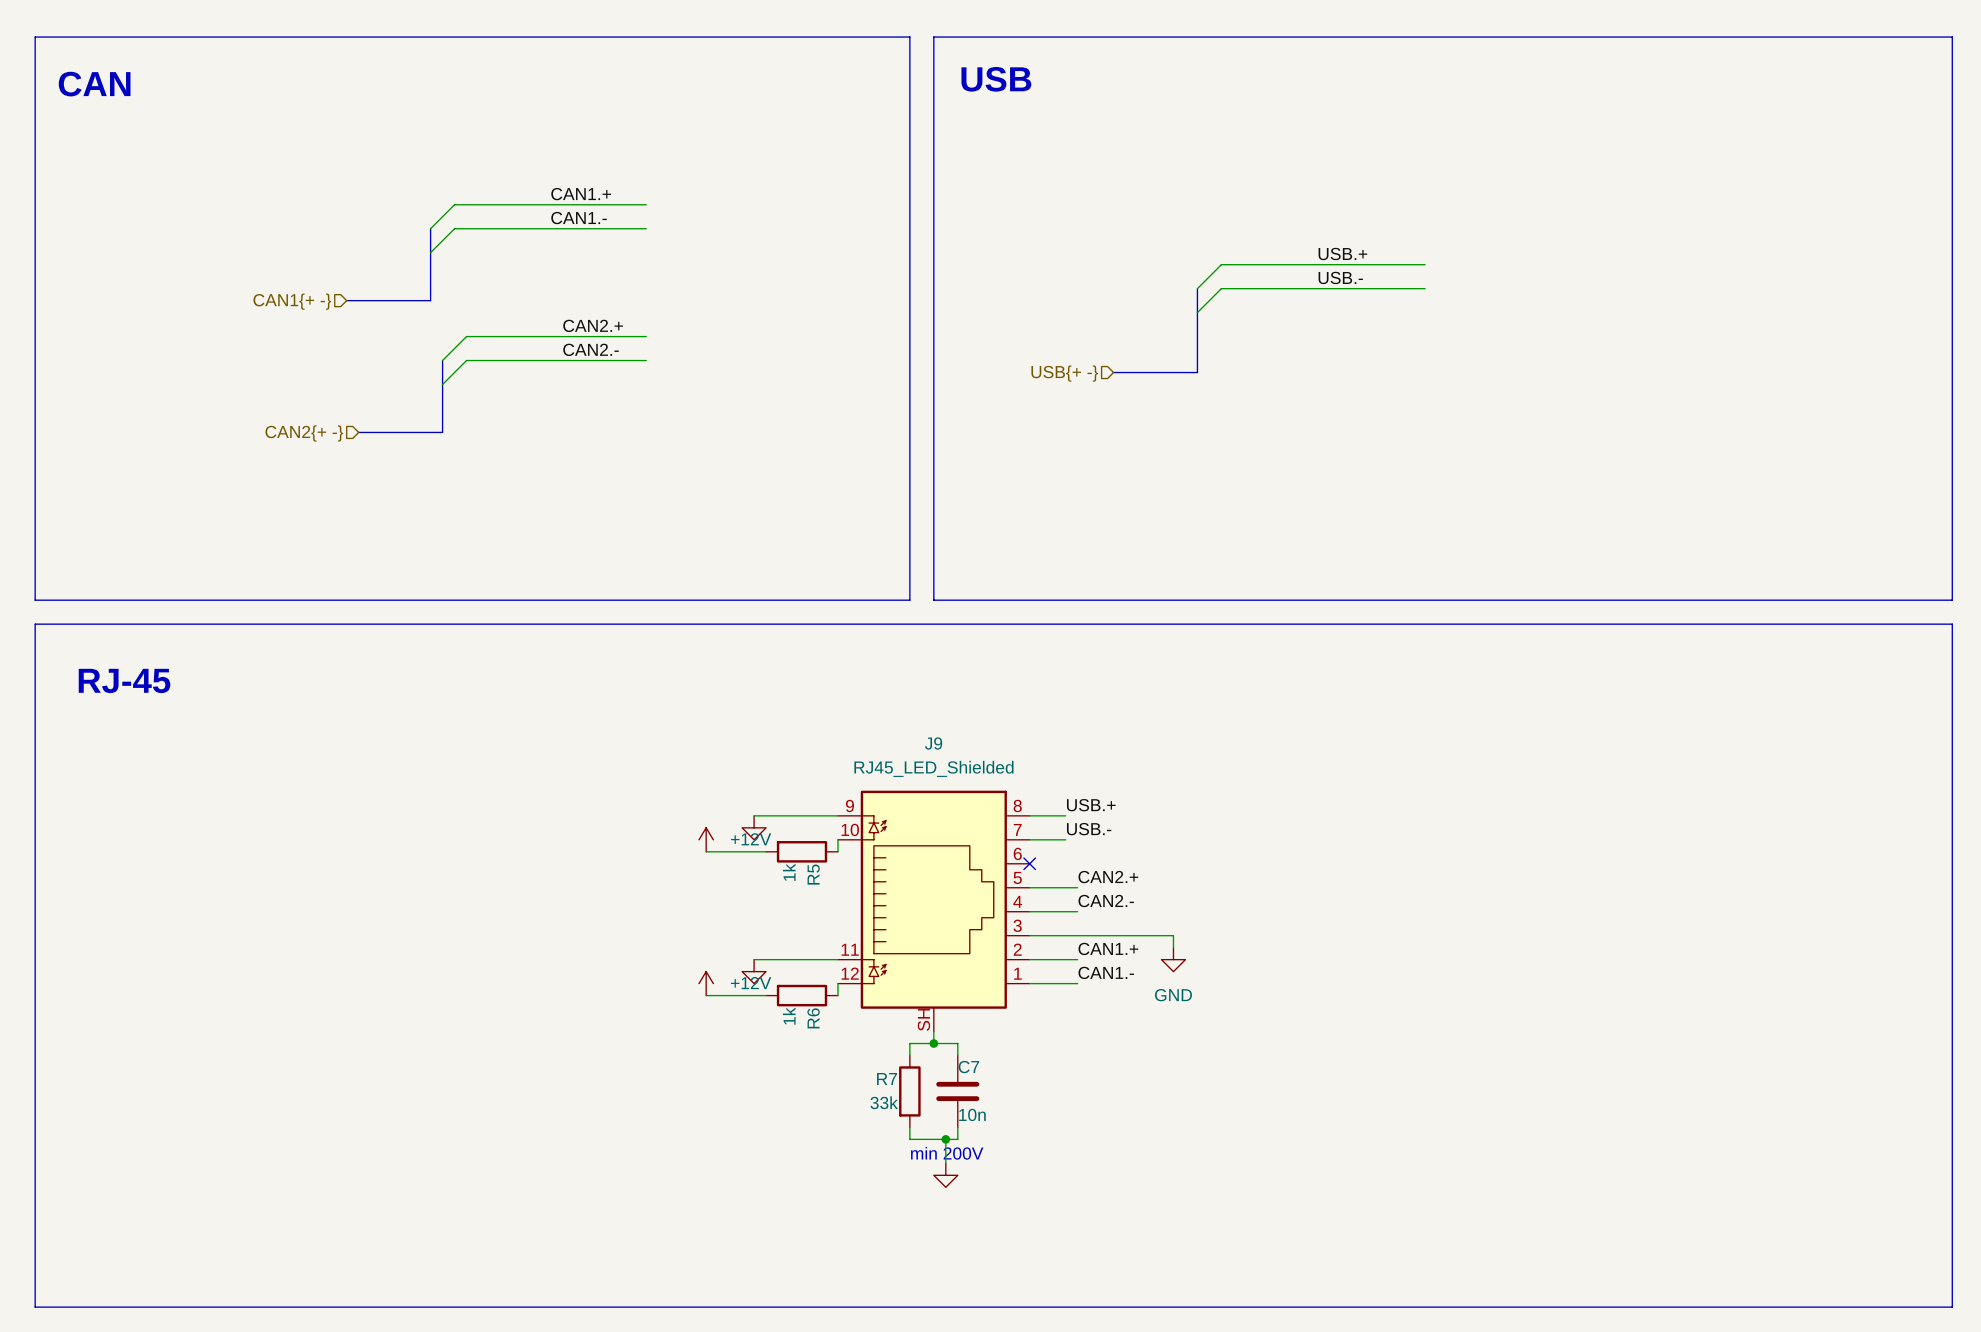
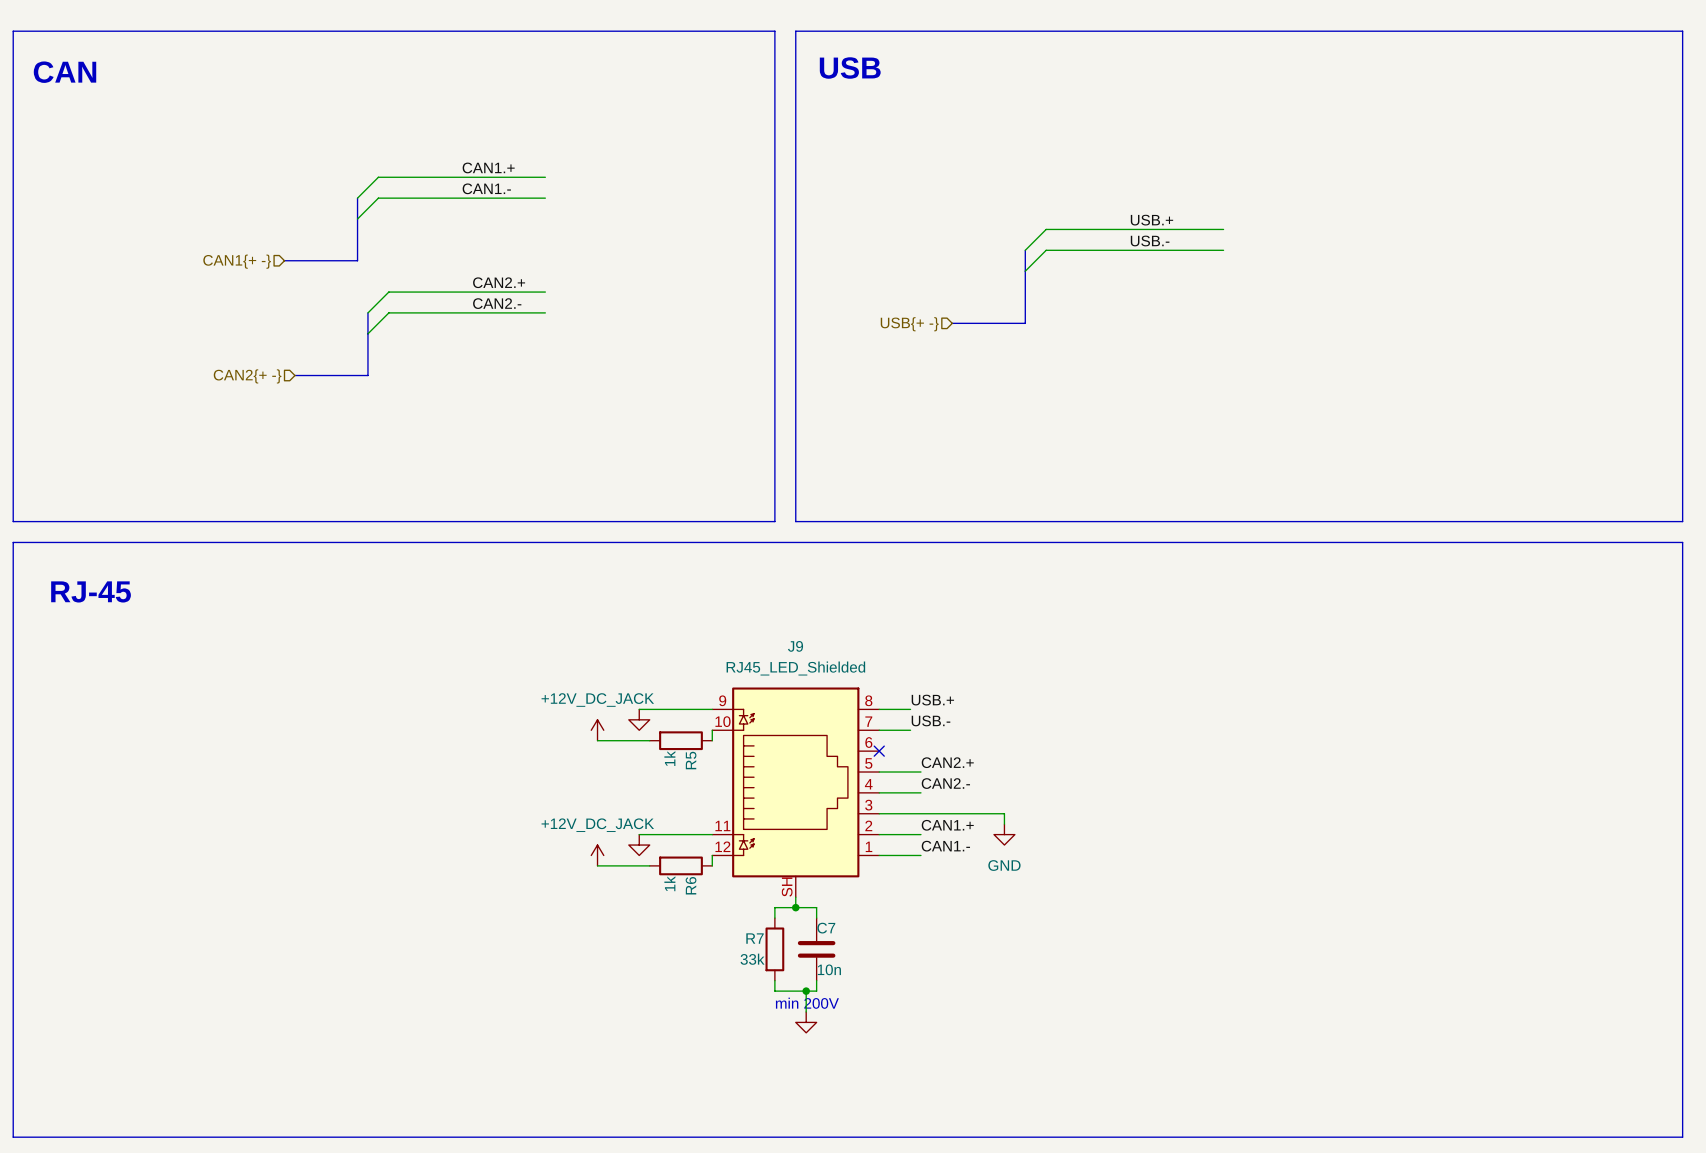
power symbol: +12V (706, 839) -> +12V_DC_JACK (597, 730)
power symbol: +12V (706, 983) -> +12V_DC_JACK (597, 855)

